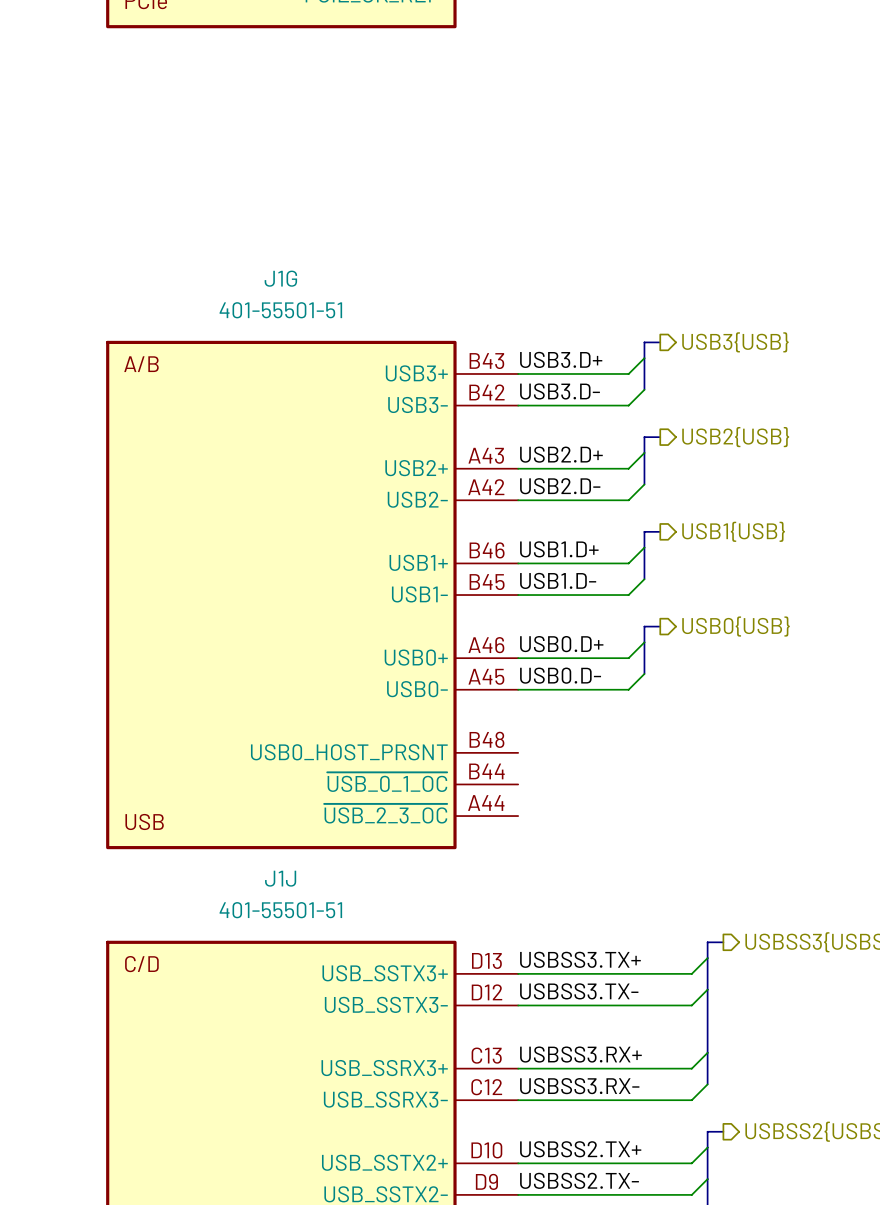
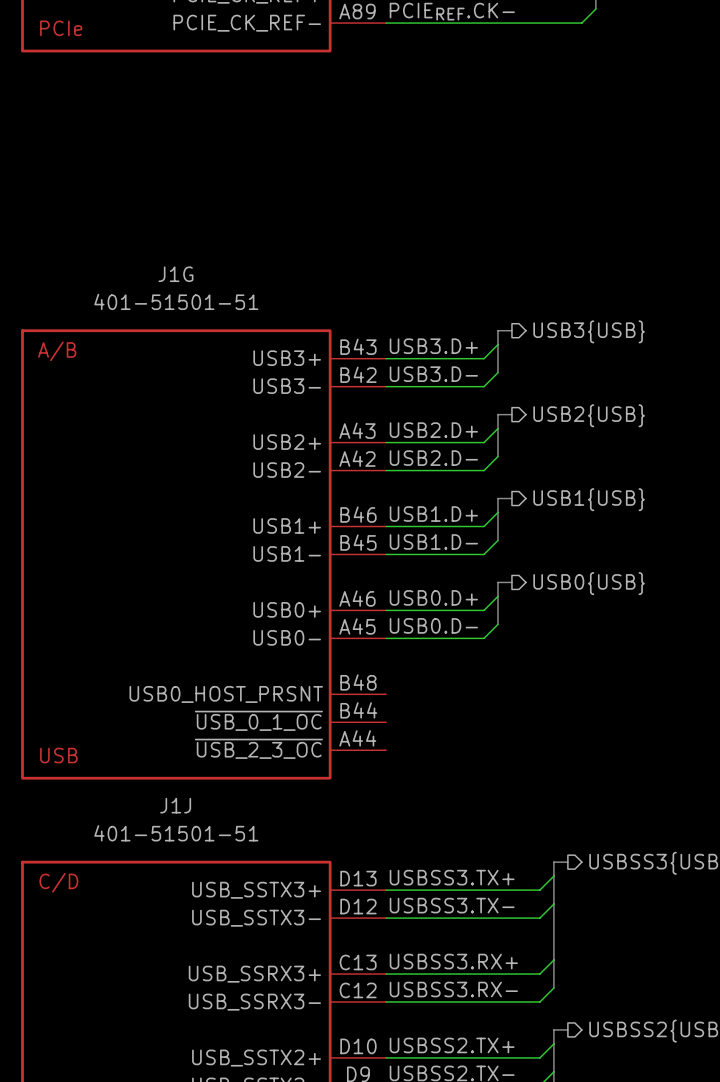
J1G text: 401-55501-51 (280, 310) -> 401-51501-51 (176, 301)
J1J text: 401-55501-51 (280, 910) -> 401-51501-51 (176, 833)

